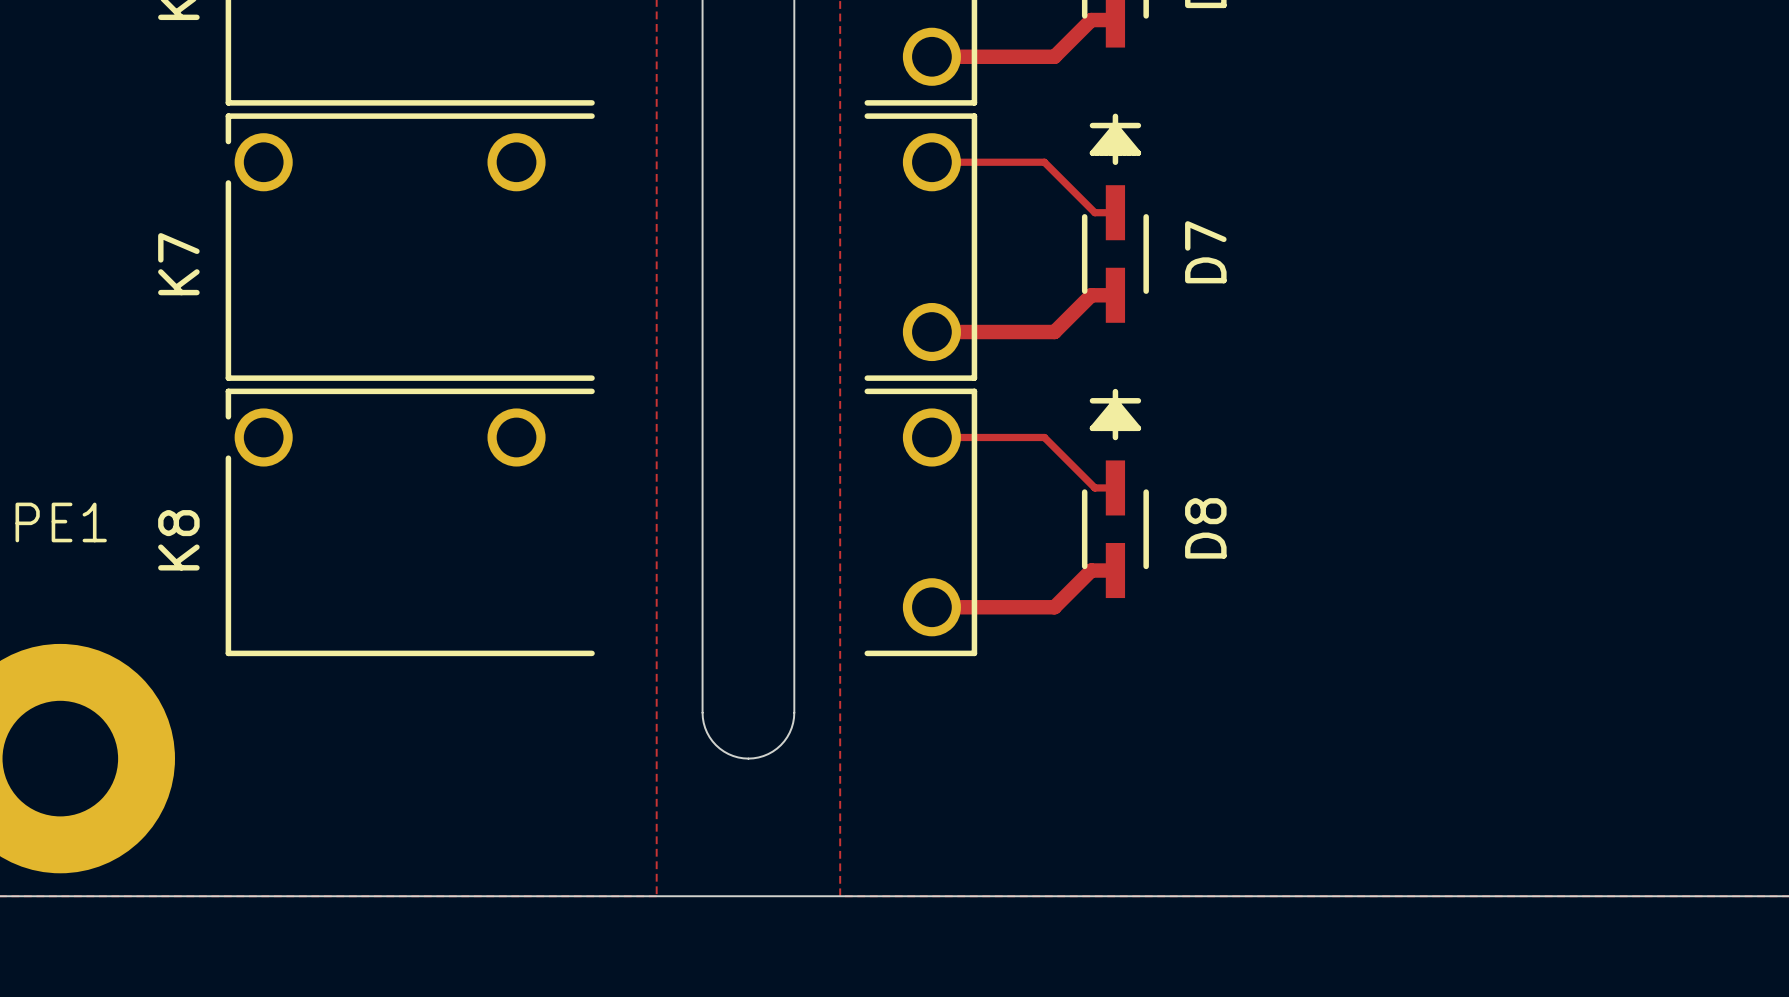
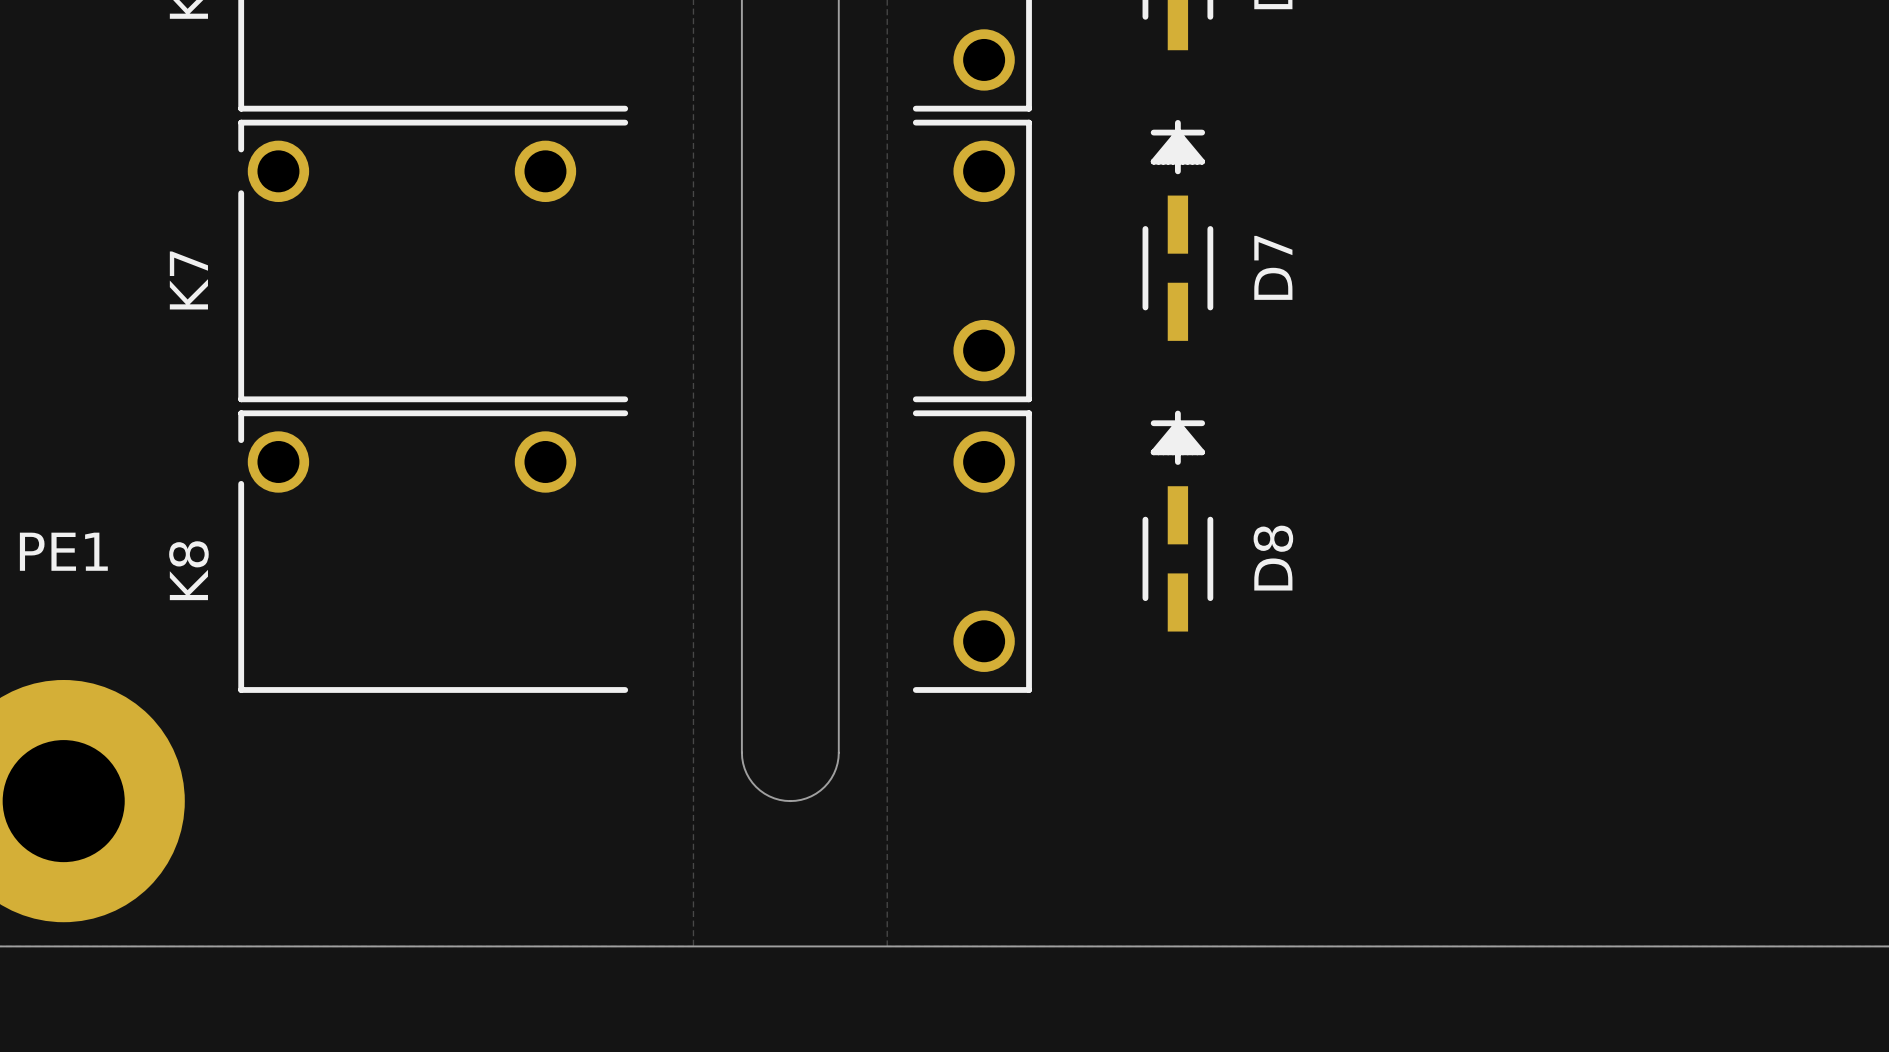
track: (1115, 20) (1091, 20) (1054, 56) (931, 56) -> none
track: (931, 162) (1044, 162) (1094, 212) (1115, 212) -> none
track: (1115, 295) (1091, 295) (1054, 332) (931, 332) -> none
track: (931, 437) (1044, 437) (1094, 487) (1115, 487) -> none
track: (1115, 570) (1091, 570) (1054, 607) (931, 607) -> none

